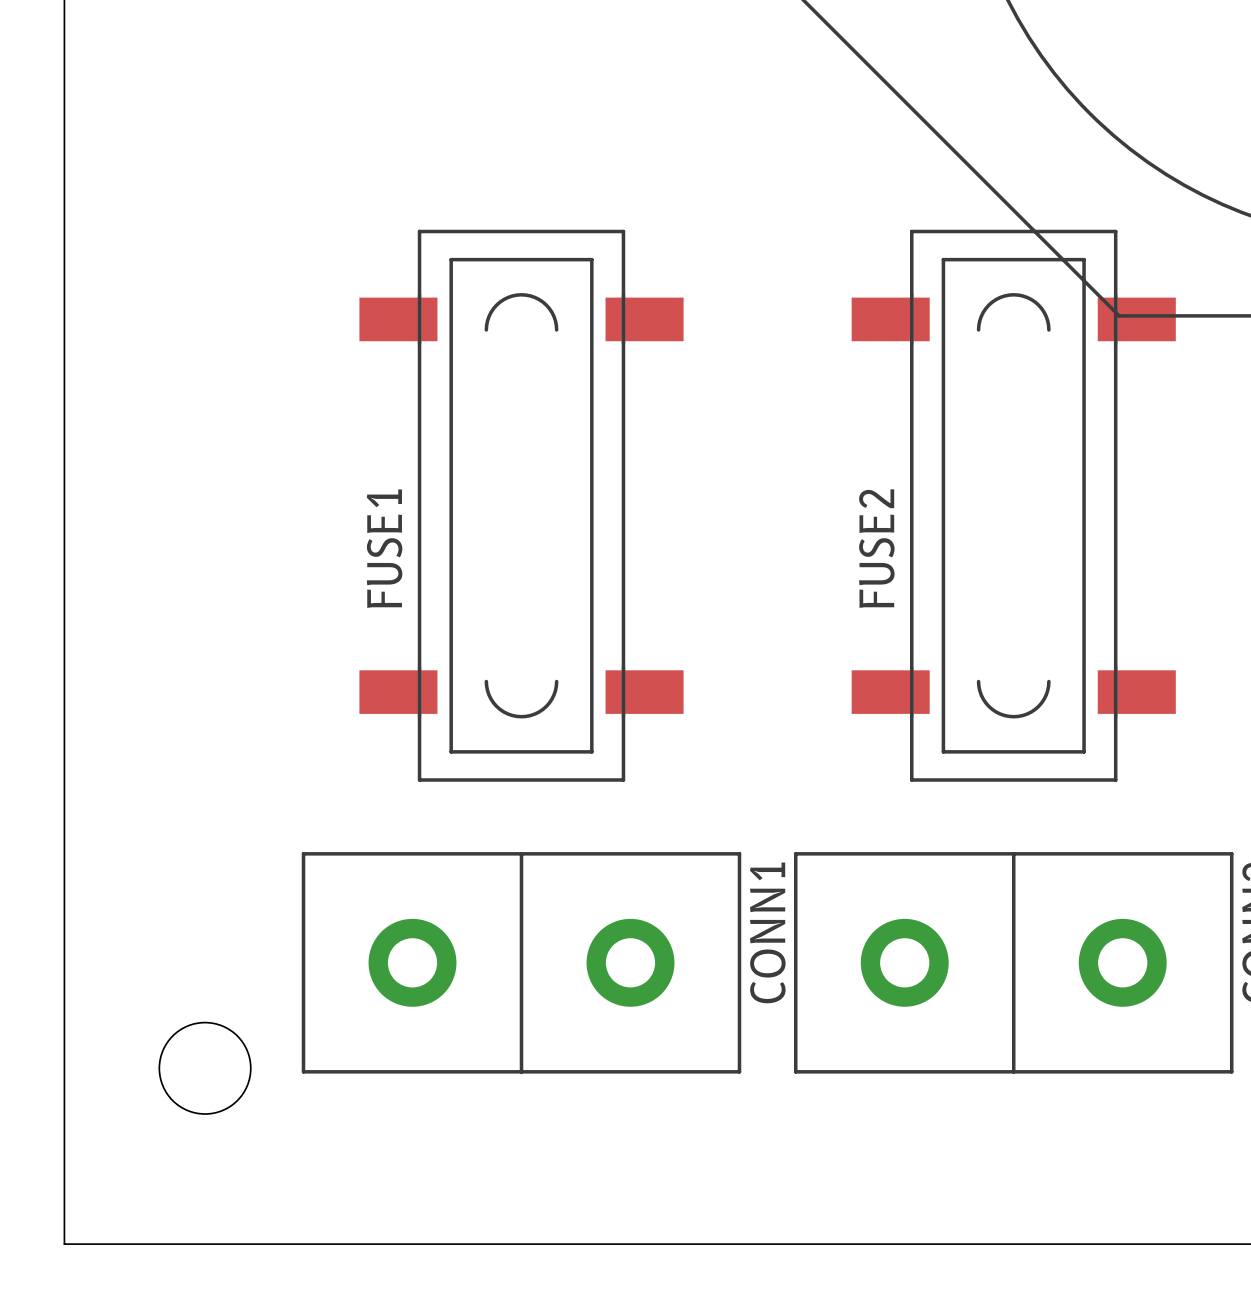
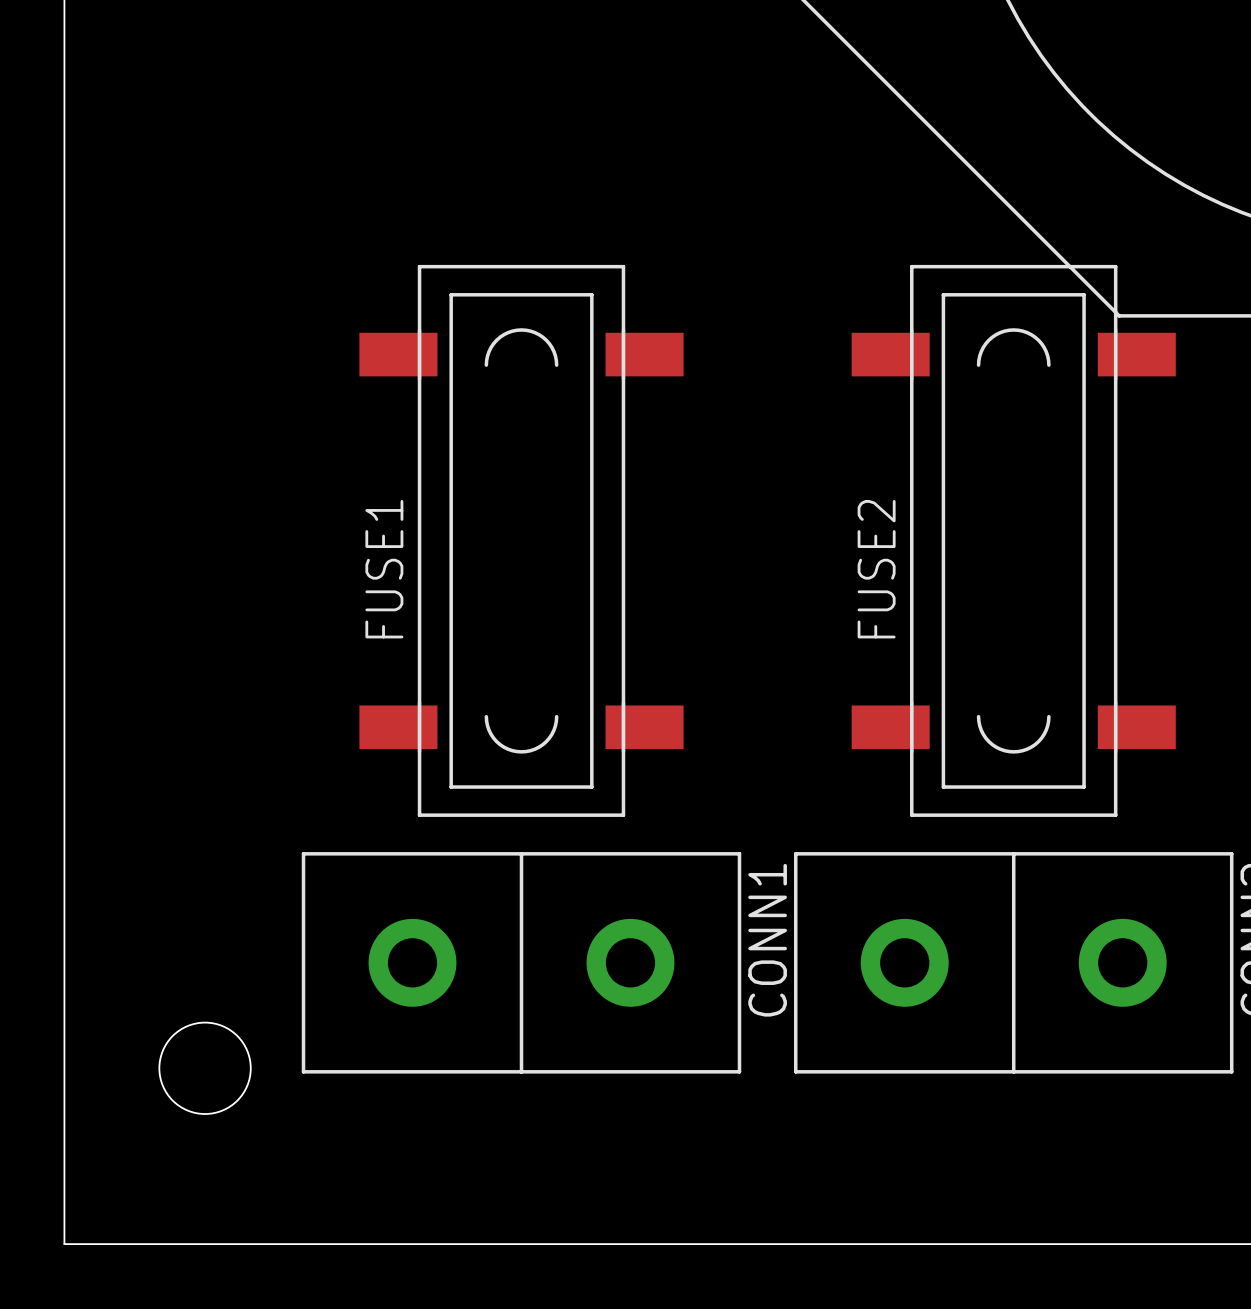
FUSE1 position: (521, 505) -> (521, 540)
FUSE2 position: (1013, 505) -> (1013, 540)

